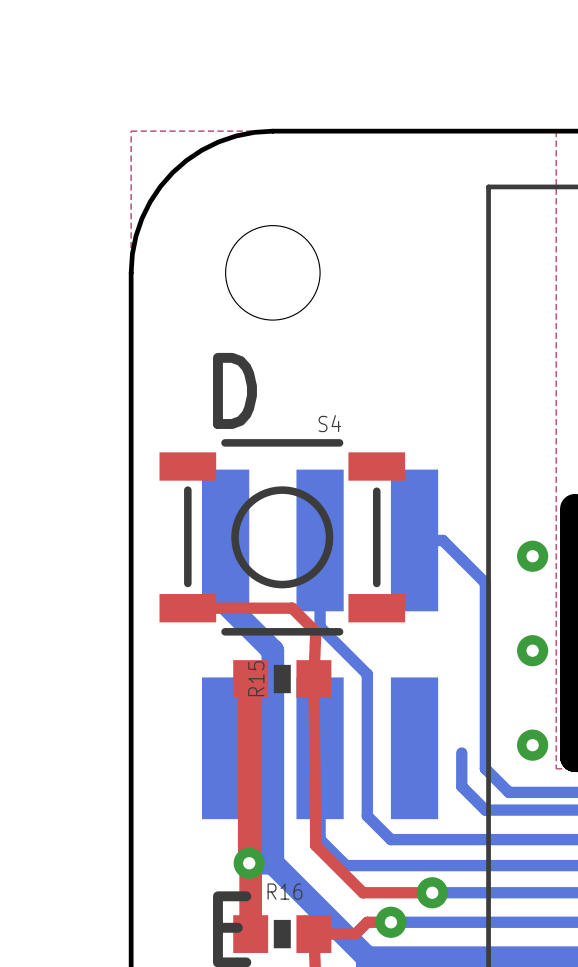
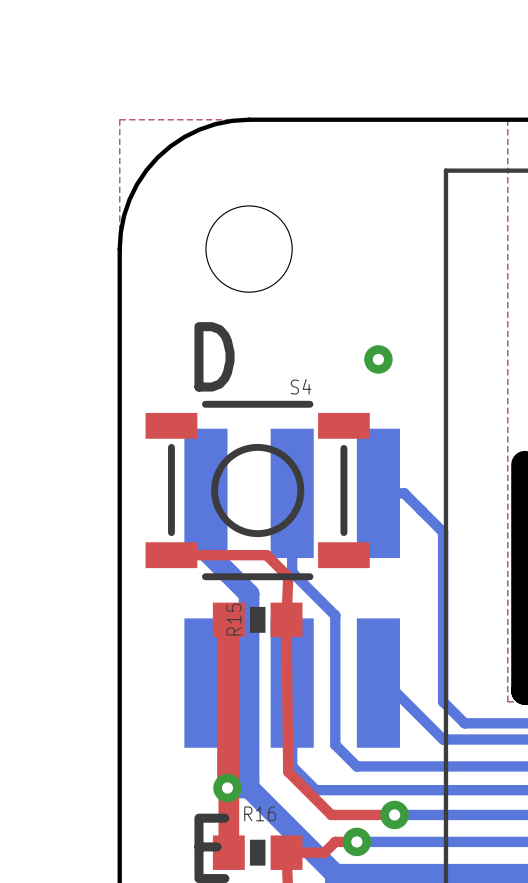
via: none -> (378, 359)
via: (532, 556) -> none
via: (532, 650) -> none
via: (532, 745) -> none
bottom track: (461, 753) (461, 786) -> (378, 683) (386, 683) (421, 717)

